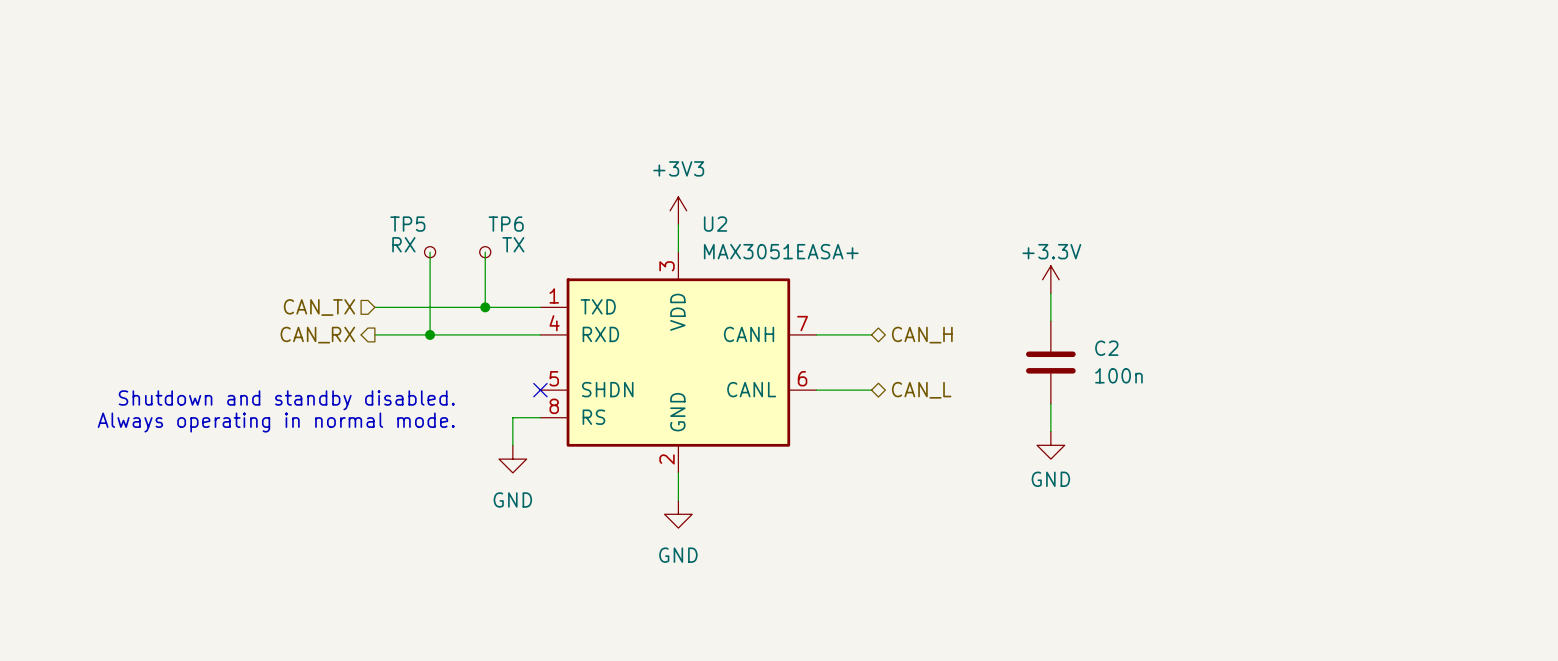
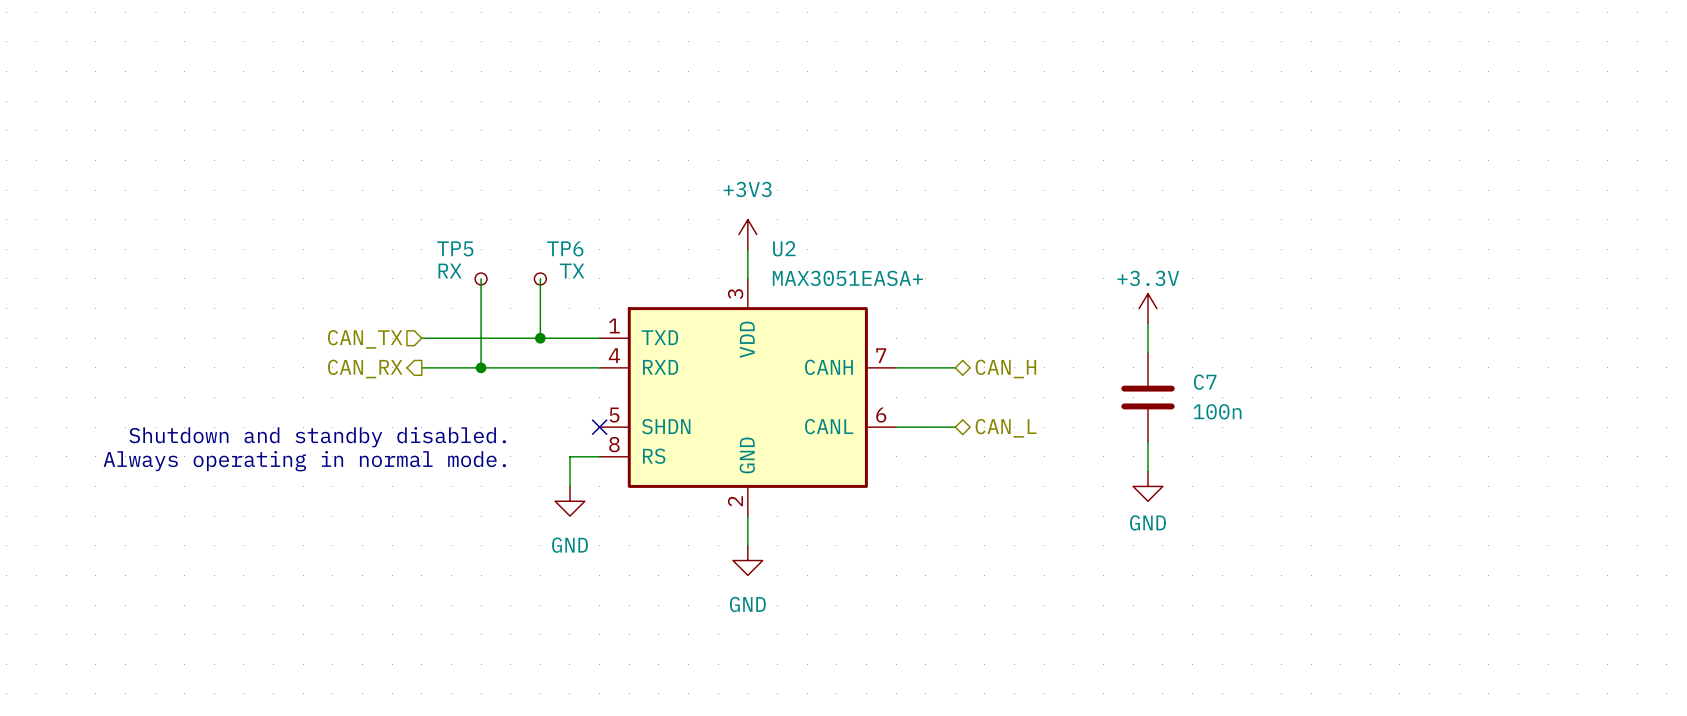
C2 name: C2 (1106, 348) -> C7 (1205, 382)

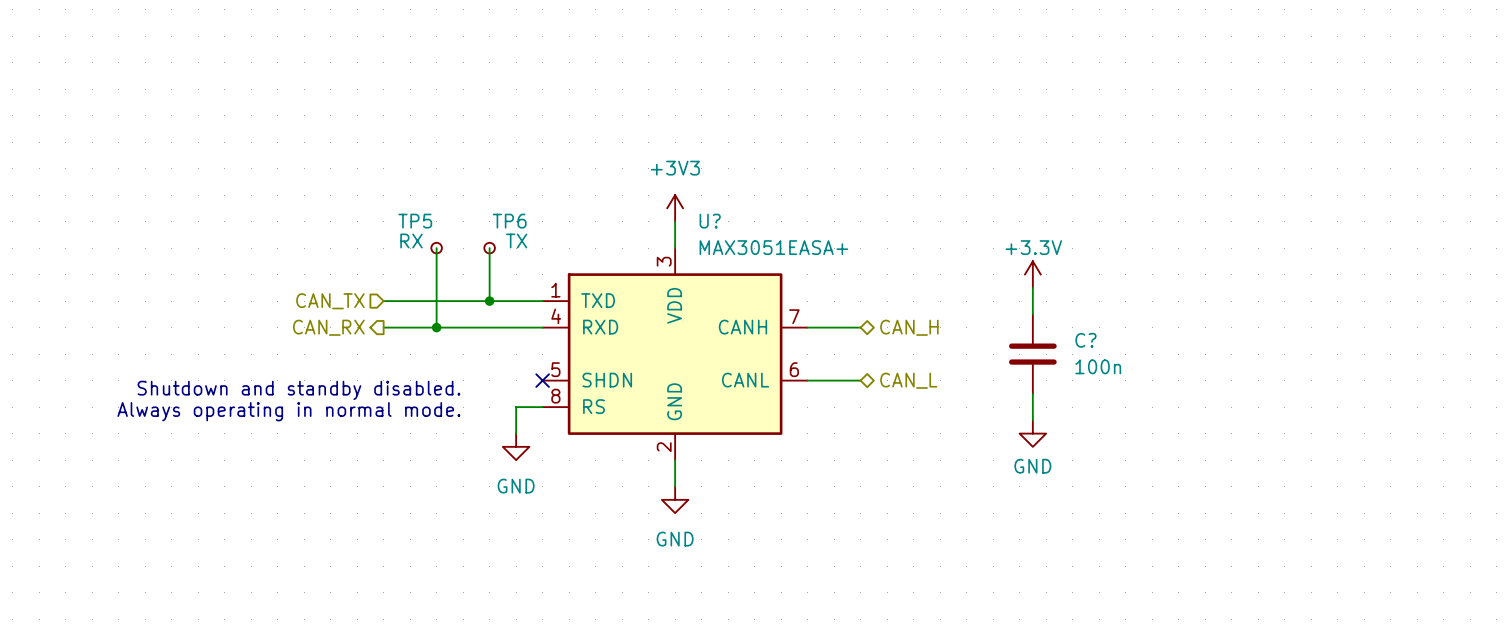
U2 name: U2 (784, 248) -> U? (710, 221)
C7 name: C7 (1205, 382) -> C? (1085, 340)

